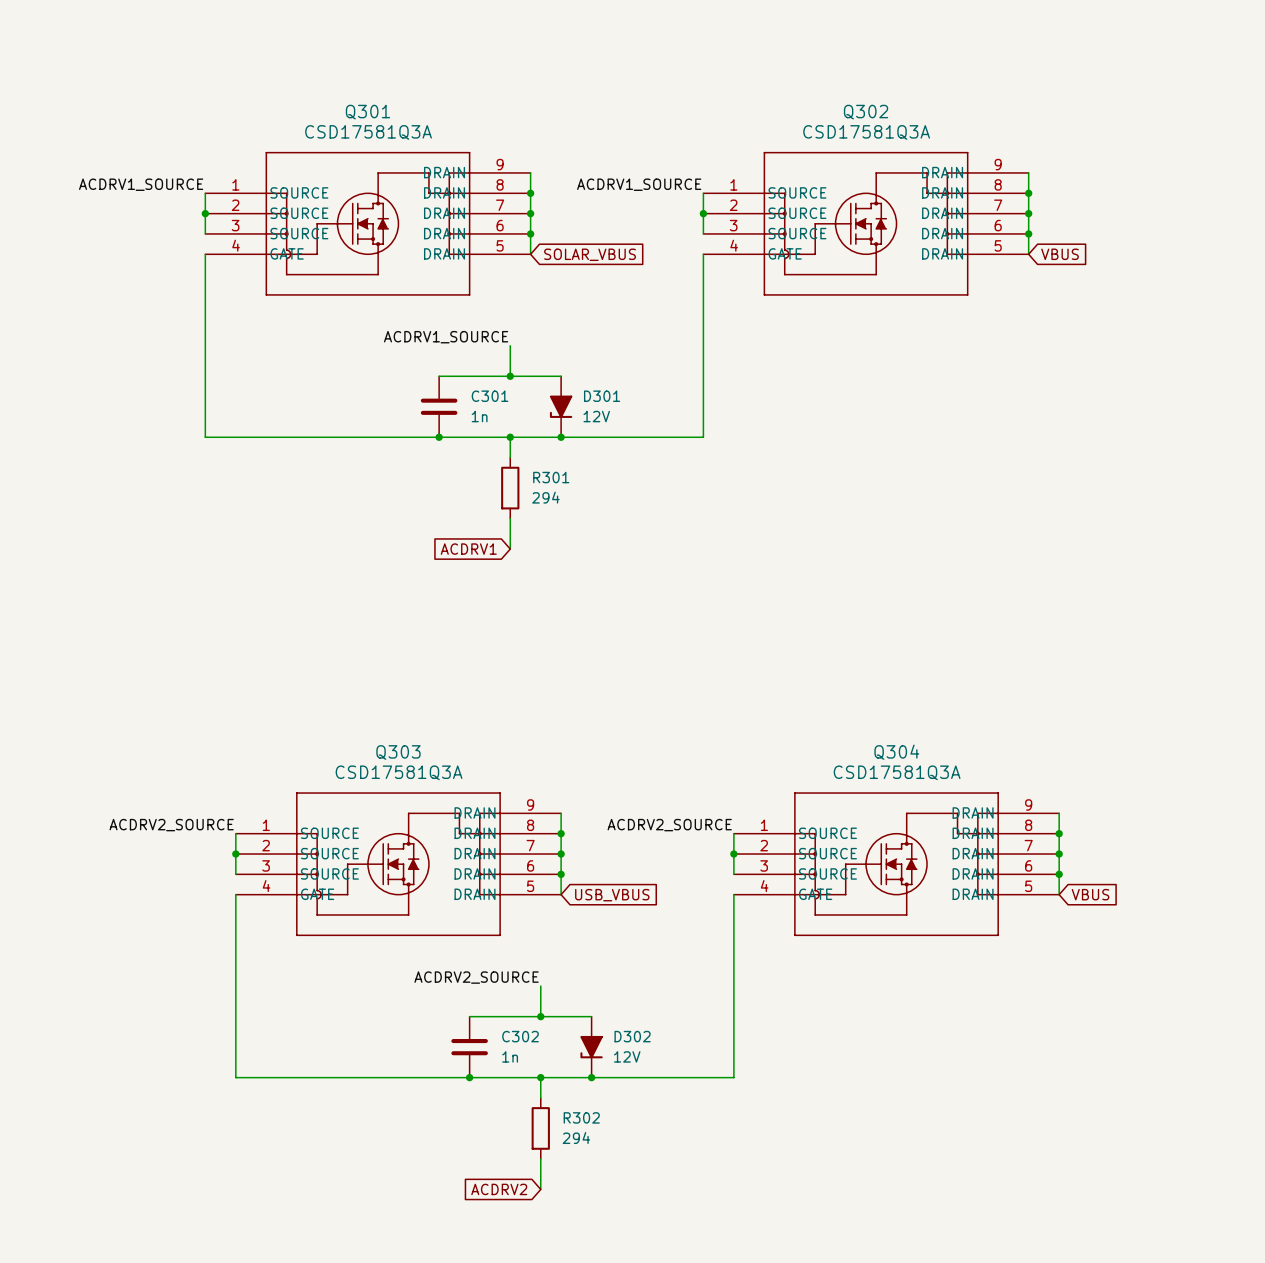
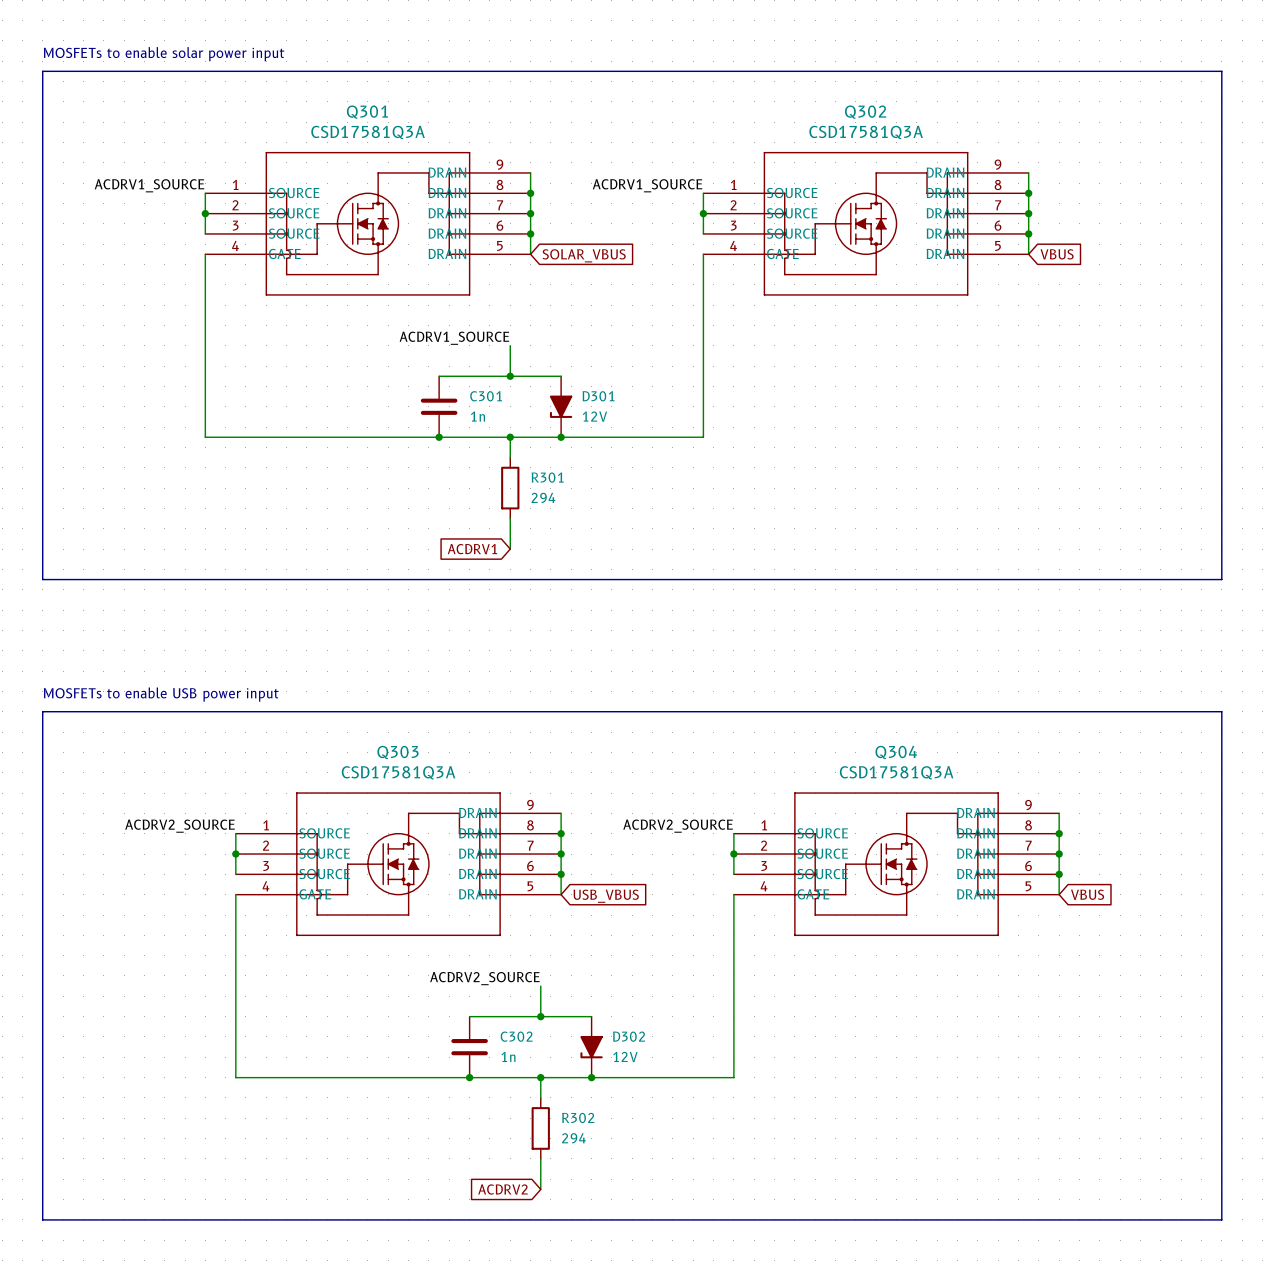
text: none -> MOSFETs to enable solar power input (164, 54)
line: none -> (42, 71) (42, 579) (1221, 579) (1221, 71) (42, 71)
text: none -> MOSFETs to enable USB power input (161, 694)
line: none -> (42, 711) (1221, 711) (1221, 1219) (42, 1219) (42, 711)

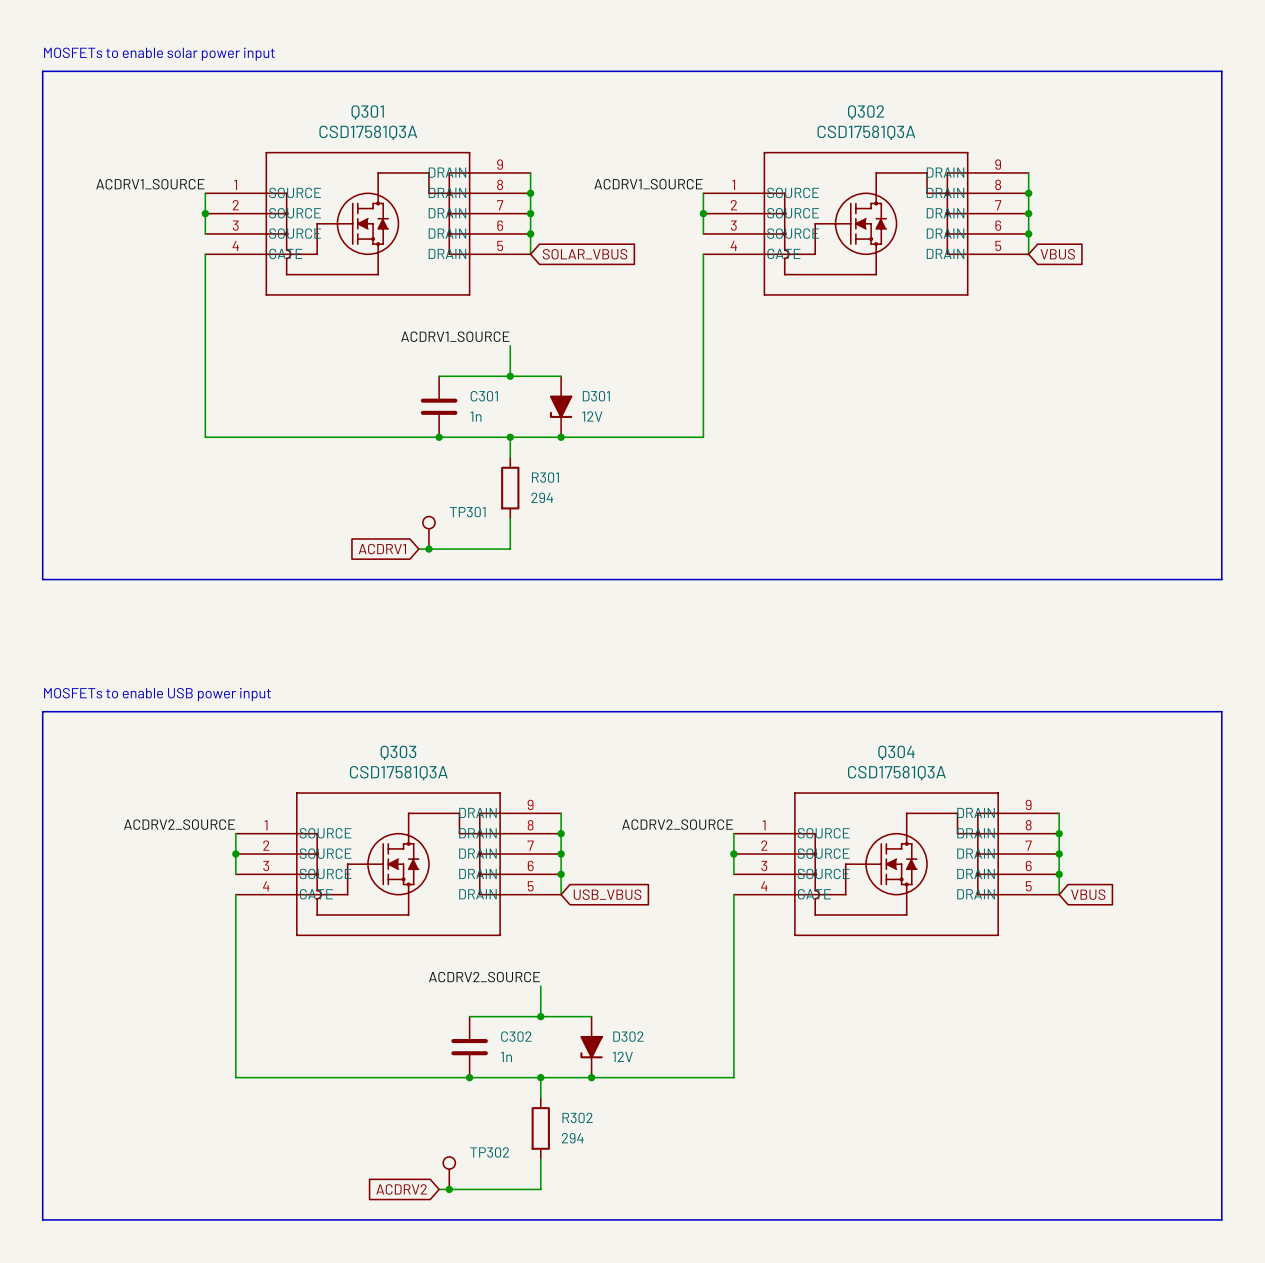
TP301: none -> (428, 532)
wire: none -> (418, 549) (510, 549)
junction: none -> (428, 549)
global label position: ACDRV1 (472, 549) -> ACDRV1 (382, 549)
TP302: none -> (449, 1173)
wire: none -> (439, 1189) (540, 1189)
junction: none -> (449, 1189)
global label position: ACDRV2 (502, 1189) -> ACDRV2 (401, 1189)

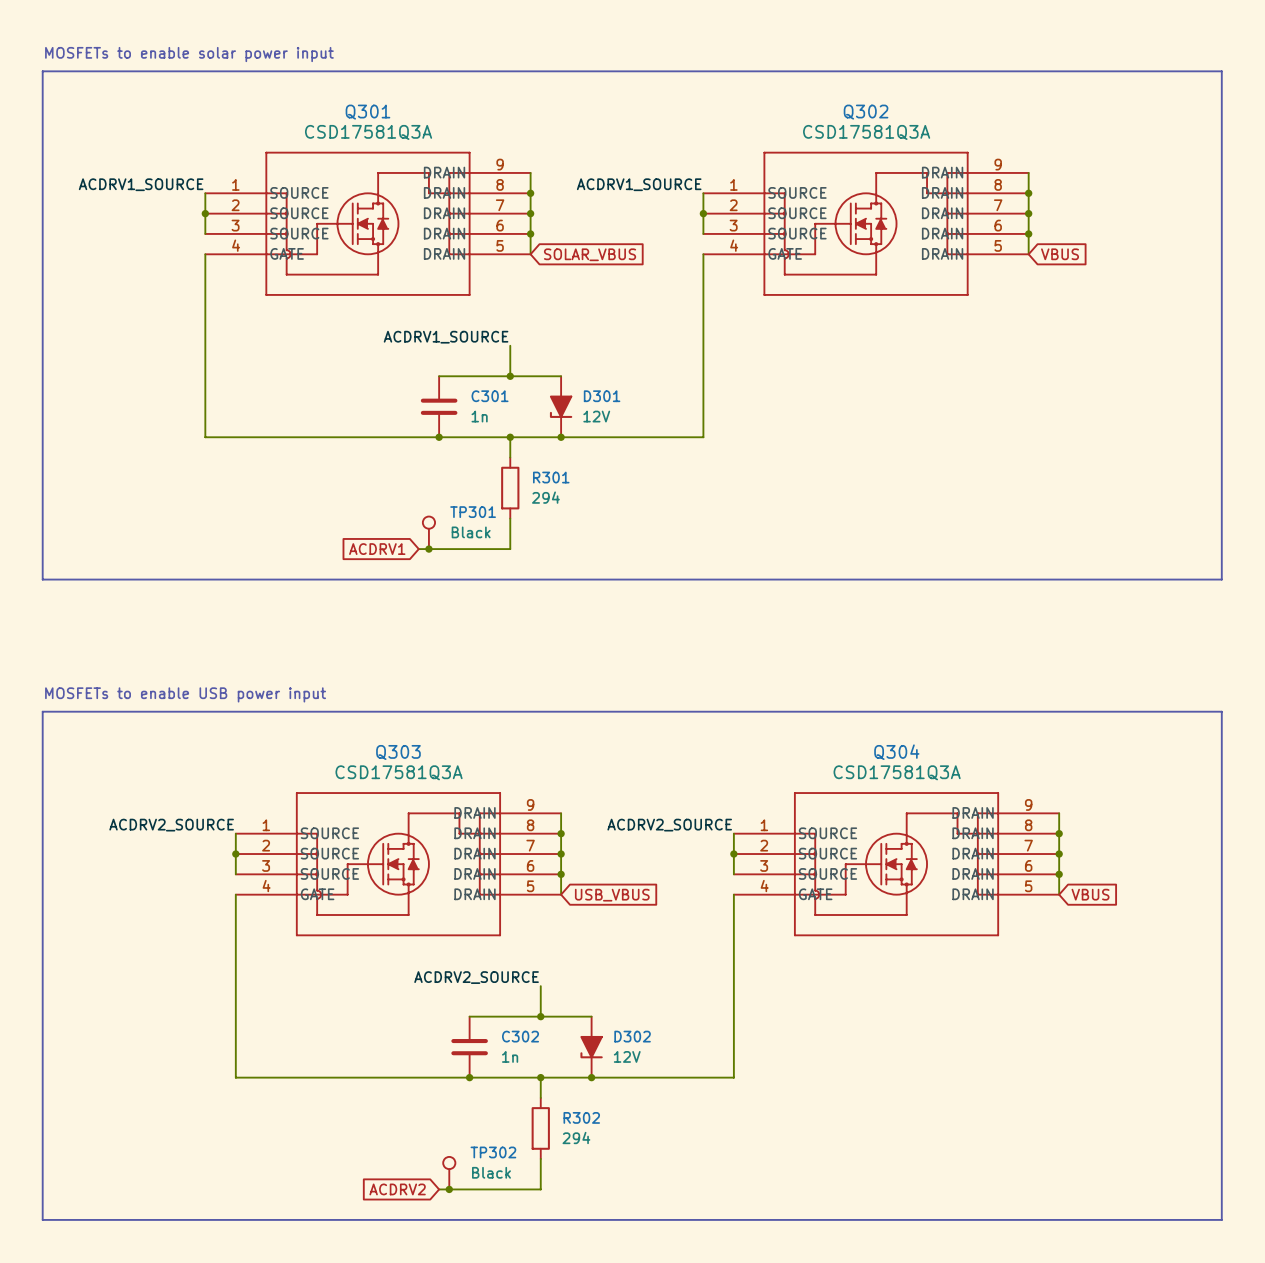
TP301 value: none -> Black (471, 532)
TP302 value: none -> Black (491, 1172)

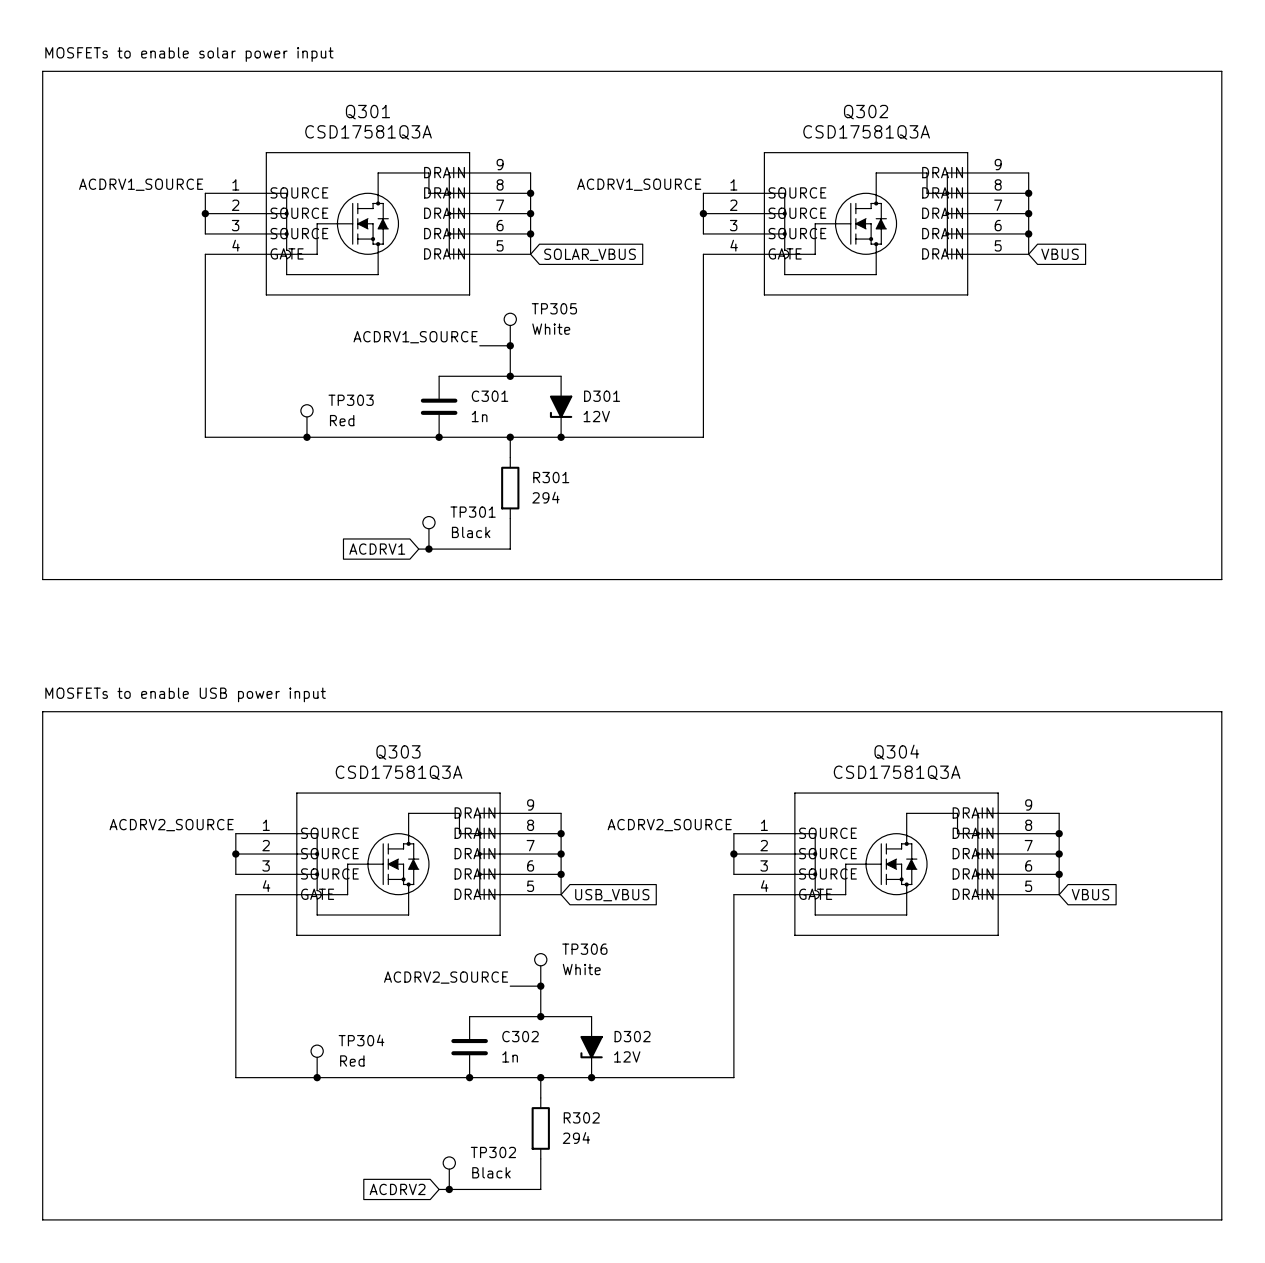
TP305: none -> White (510, 329)
label position: ACDRV1_SOURCE (446, 337) -> ACDRV1_SOURCE (415, 337)
wire: none -> (479, 345) (510, 345)
junction: none -> (510, 345)
TP303: none -> Red (306, 420)
junction: none -> (306, 437)
TP306: none -> White (540, 969)
label position: ACDRV2_SOURCE (476, 977) -> ACDRV2_SOURCE (446, 977)
wire: none -> (510, 986) (540, 986)
junction: none -> (540, 986)
TP304: none -> Red (317, 1061)
junction: none -> (317, 1077)

